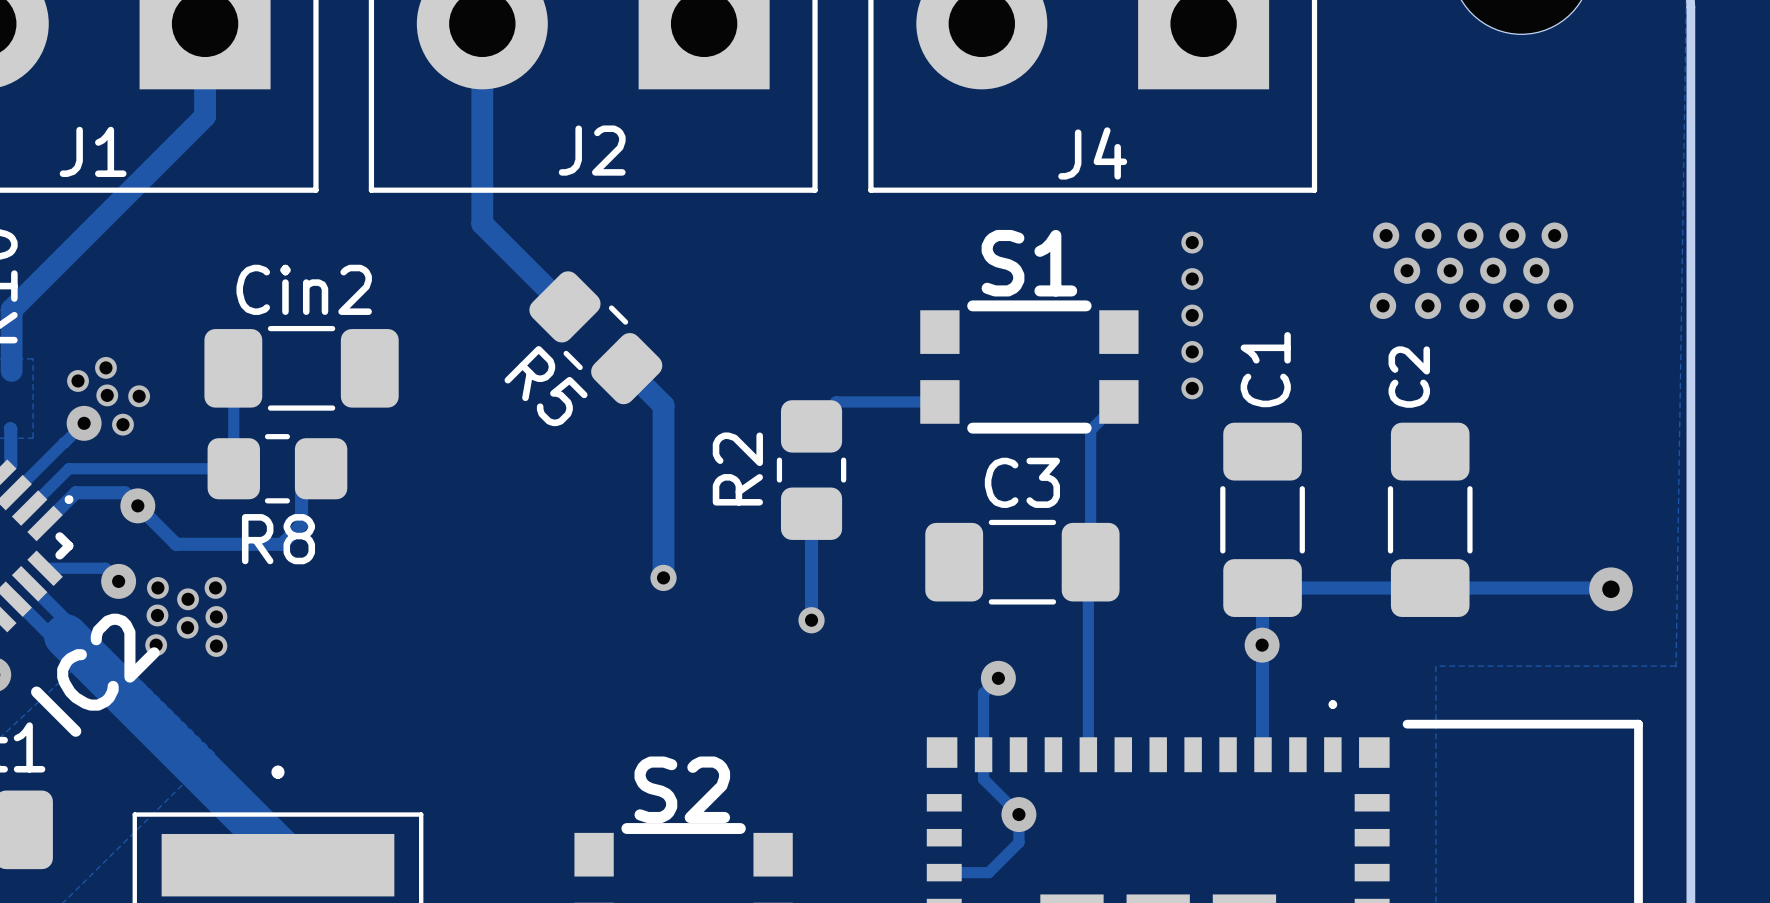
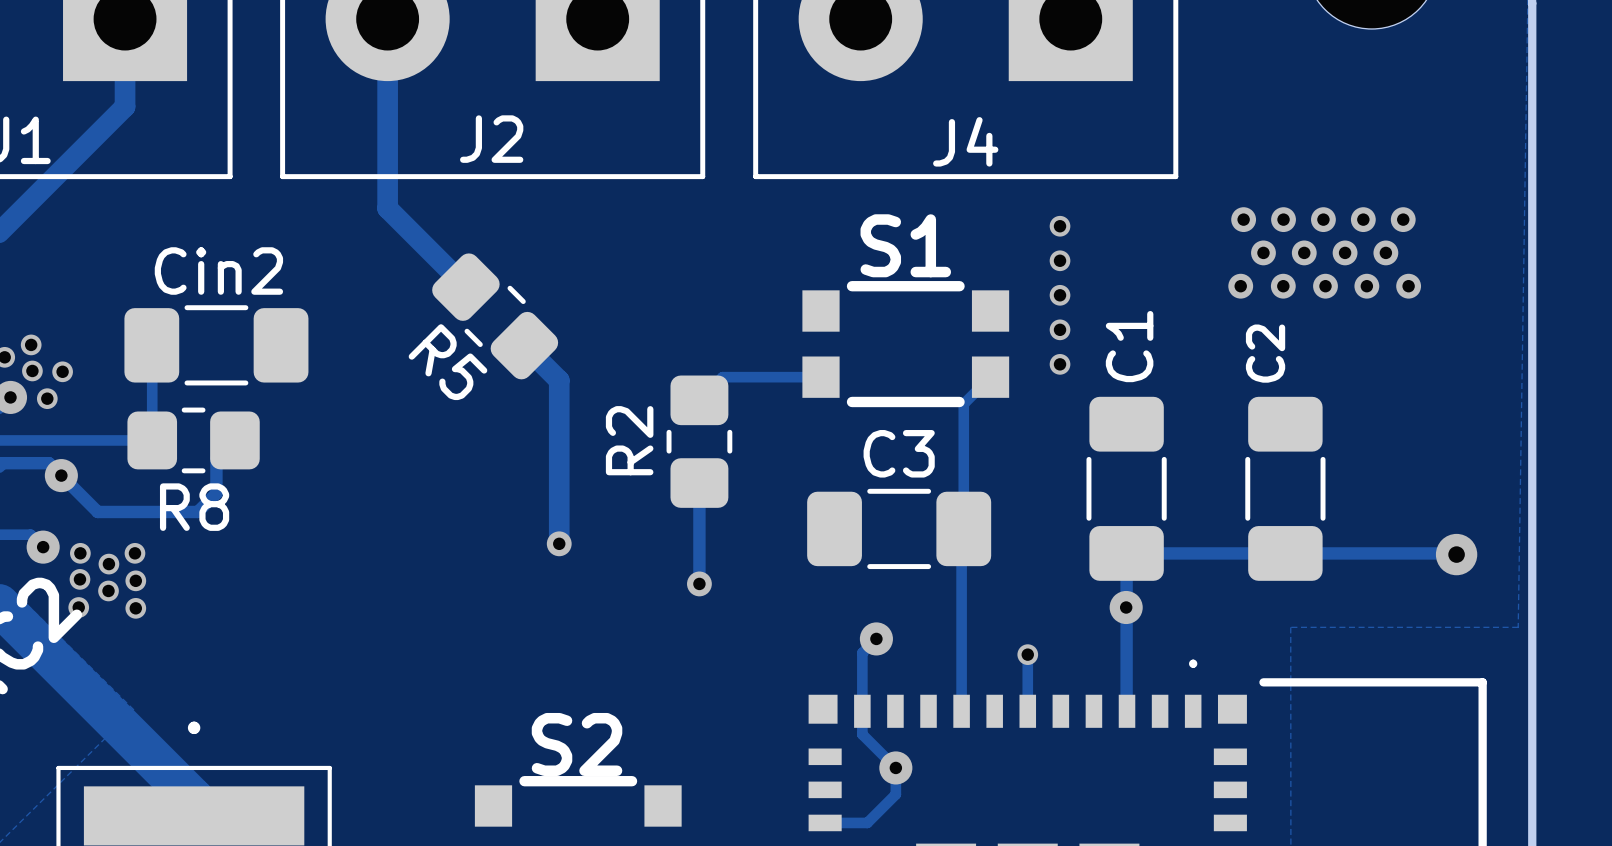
track: none -> (1027, 654) (1027, 711)
via: none -> (1027, 654)

